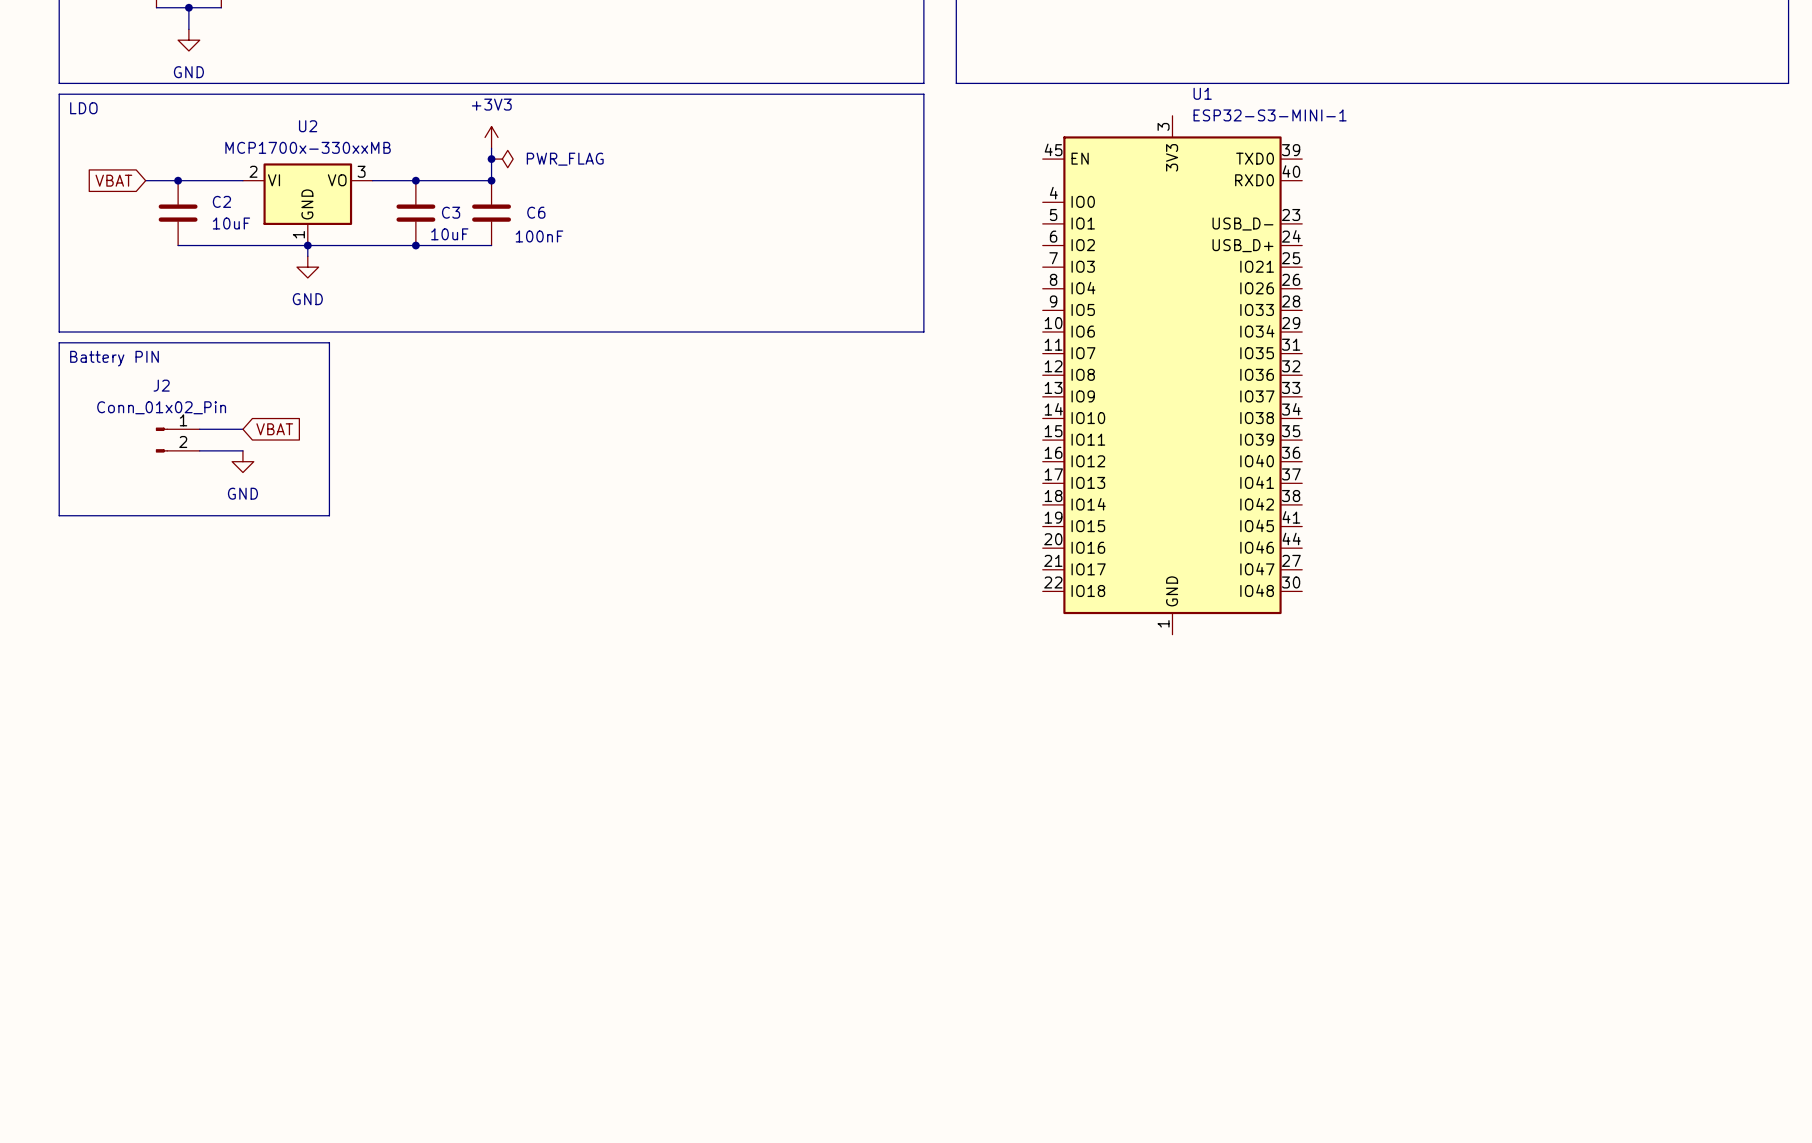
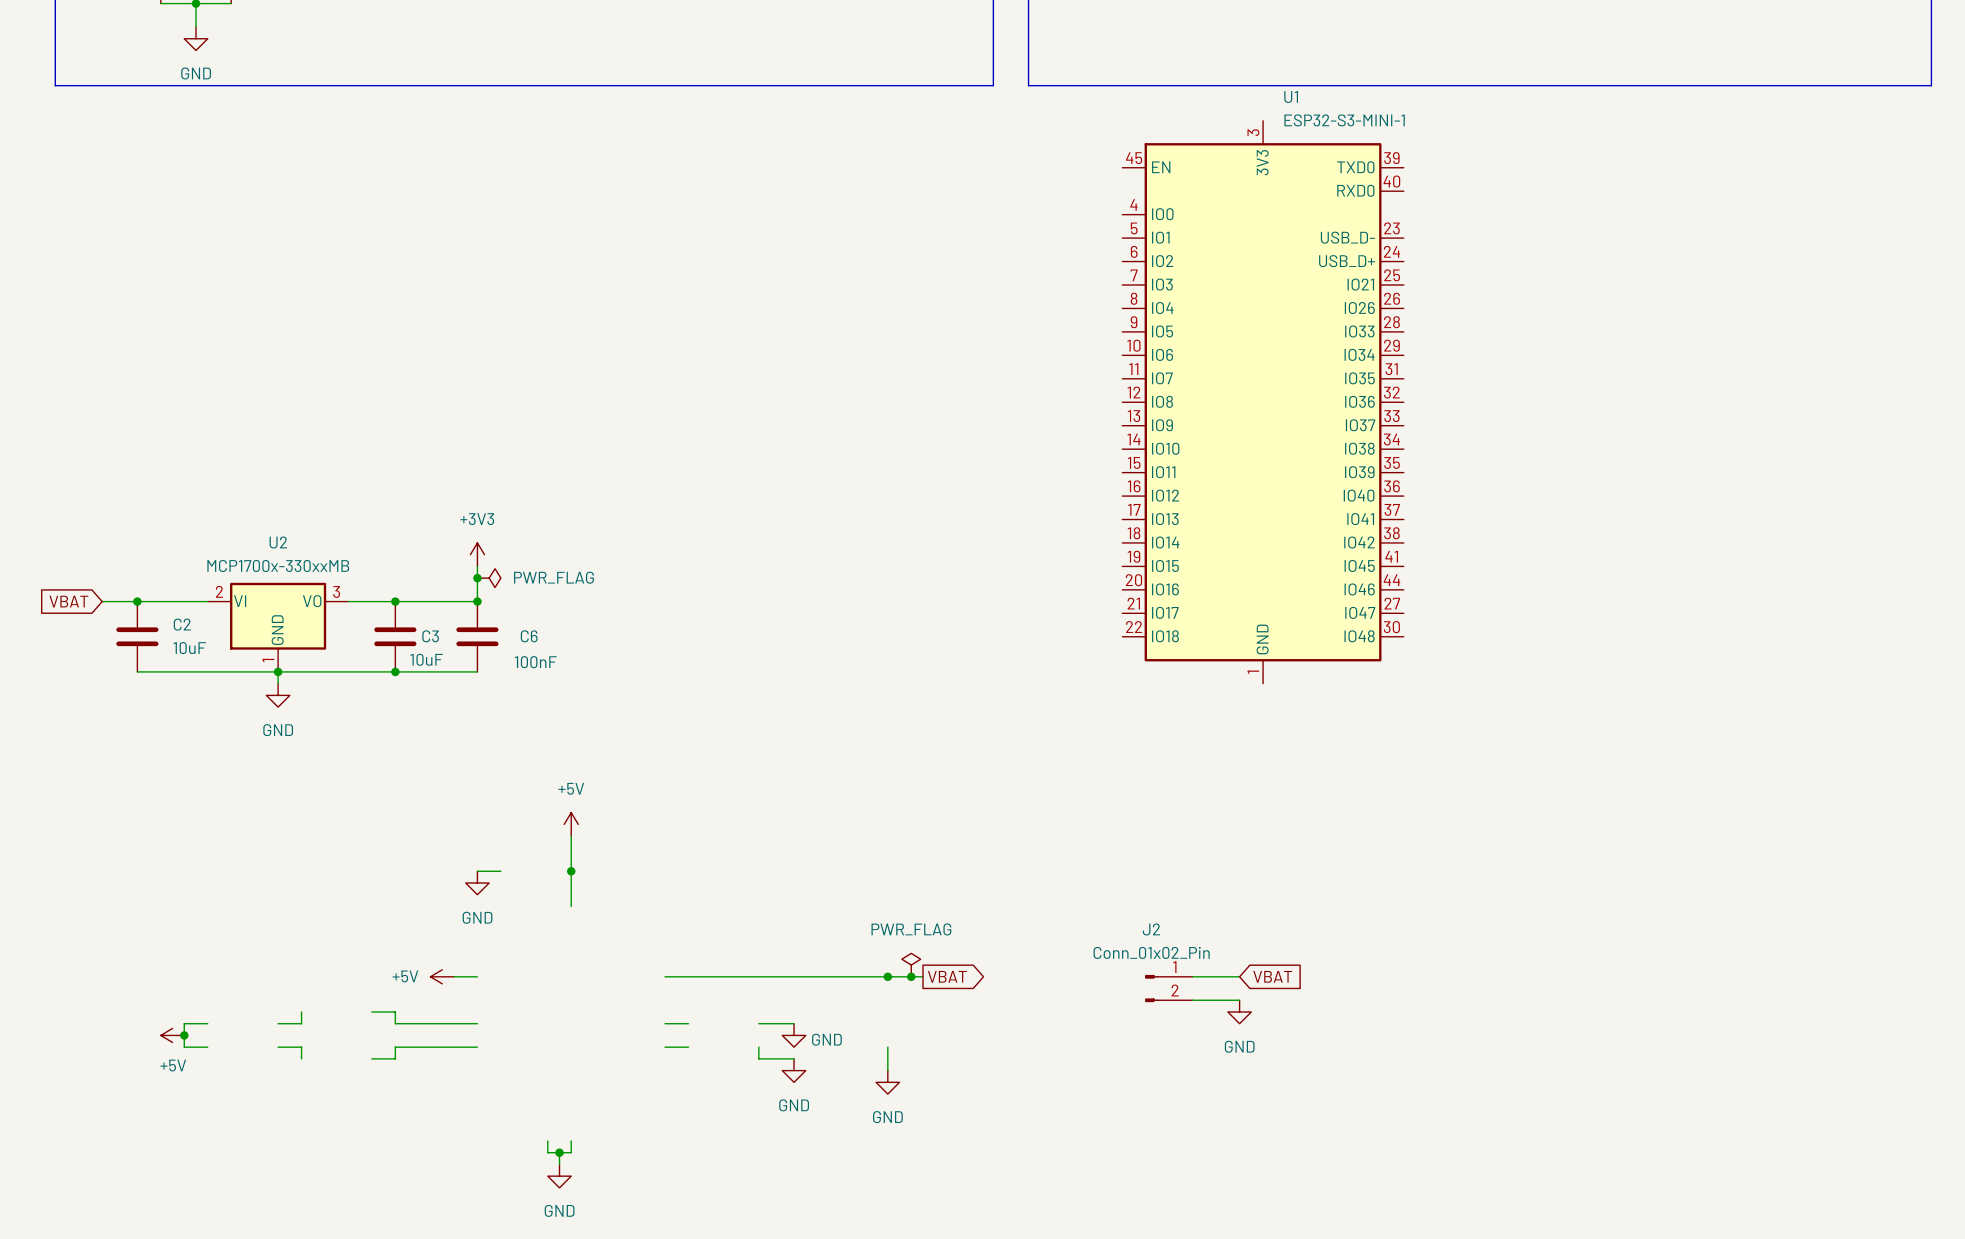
line: (59, 94) (59, 332) (923, 332) (923, 94) (59, 94) -> none
text: LDO (83, 108) -> none
power symbol: +3V3 (491, 137) -> none
wire: (491, 148) (491, 180) (372, 180) -> none
junction: (491, 159) -> none
power symbol: PWR_FLAG (502, 159) -> none
global label: VBAT (113, 180) -> none
wire: (145, 180) (242, 180) -> none
junction: (178, 180) -> none
junction: (415, 180) -> none
junction: (491, 180) -> none
U2 position: (307, 204) -> (278, 627)
C2 position: (178, 213) -> (137, 636)
C3 position: (415, 213) -> (395, 636)
C6 position: (491, 213) -> (477, 636)
wire: (178, 245) (491, 245) -> none
wire: (307, 245) (307, 256) -> none
junction: (307, 245) -> none
junction: (415, 245) -> none
power symbol: GND (307, 267) -> none
line: (59, 342) (329, 342) (329, 515) (59, 515) (59, 342) -> none
text: Battery PIN (114, 358) -> none
wire: (199, 429) (242, 429) -> none
global label: VBAT (274, 429) -> none
J2 position: (177, 440) -> (1168, 988)
wire: (199, 450) (242, 450) -> none
power symbol position: GND (242, 461) -> GND (278, 695)
power symbol: none -> +3V3 (477, 554)
wire: none -> (477, 566) (477, 601) (348, 601)
junction: none -> (477, 578)
power symbol: none -> PWR_FLAG (489, 578)
global label: none -> VBAT (68, 601)
wire: none -> (102, 601) (207, 601)
junction: none -> (137, 601)
junction: none -> (395, 601)
junction: none -> (477, 601)
wire: none -> (137, 671) (477, 671)
wire: none -> (278, 671) (278, 683)
junction: none -> (278, 671)
junction: none -> (395, 671)
power symbol: none -> +5V (571, 824)
wire: none -> (571, 836) (571, 906)
wire: none -> (477, 871) (500, 871)
junction: none -> (571, 871)
power symbol: none -> GND (477, 883)
power symbol: none -> PWR_FLAG (911, 965)
power symbol: none -> +5V (442, 976)
wire: none -> (453, 976) (477, 976)
wire: none -> (665, 976) (923, 976)
junction: none -> (887, 976)
junction: none -> (911, 976)
global label: none -> VBAT (947, 976)
wire: none -> (1192, 976) (1239, 976)
global label: none -> VBAT (1272, 976)
wire: none -> (1192, 1000) (1239, 1000)
wire: none -> (301, 1011) (301, 1023) (278, 1023)
wire: none -> (371, 1011) (395, 1011) (395, 1023) (477, 1023)
power symbol: none -> GND (1239, 1011)
wire: none -> (207, 1023) (184, 1023) (184, 1047) (207, 1047)
wire: none -> (665, 1023) (688, 1023)
wire: none -> (758, 1023) (794, 1023)
power symbol: none -> +5V (172, 1035)
junction: none -> (184, 1035)
power symbol: none -> GND (794, 1035)
wire: none -> (278, 1047) (301, 1047) (301, 1058)
wire: none -> (477, 1047) (395, 1047) (395, 1058) (371, 1058)
wire: none -> (665, 1047) (688, 1047)
wire: none -> (758, 1047) (758, 1058) (794, 1058)
wire: none -> (887, 1047) (887, 1070)
power symbol: none -> GND (794, 1070)
power symbol: none -> GND (887, 1082)
wire: none -> (547, 1140) (547, 1152) (571, 1152) (571, 1140)
wire: none -> (559, 1152) (559, 1164)
junction: none -> (559, 1152)
power symbol: none -> GND (559, 1176)

